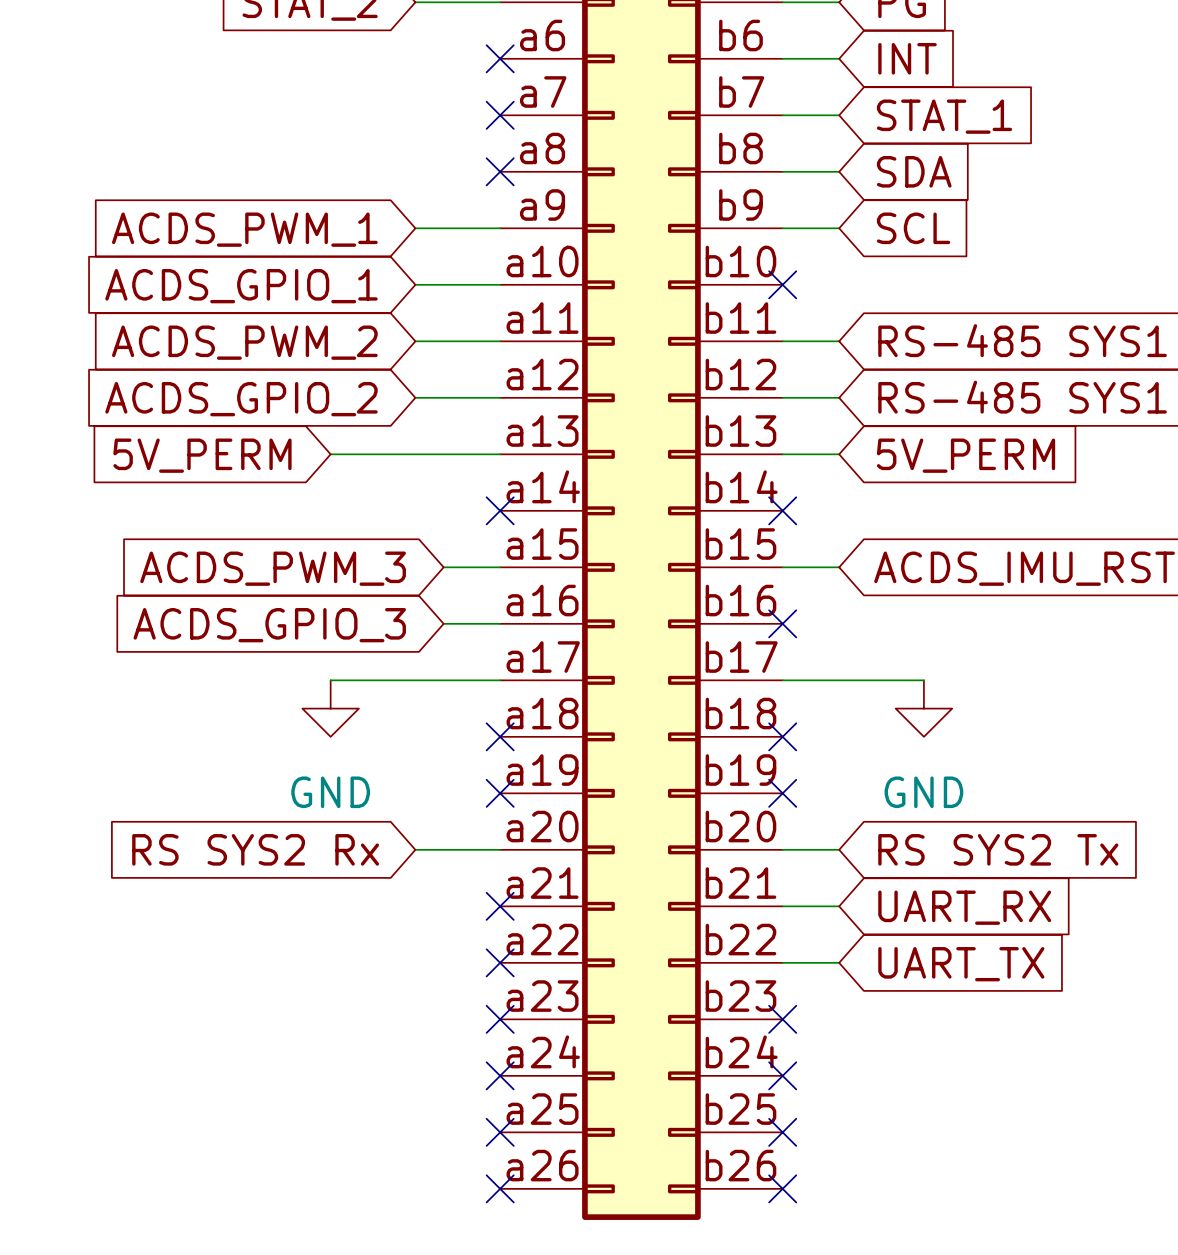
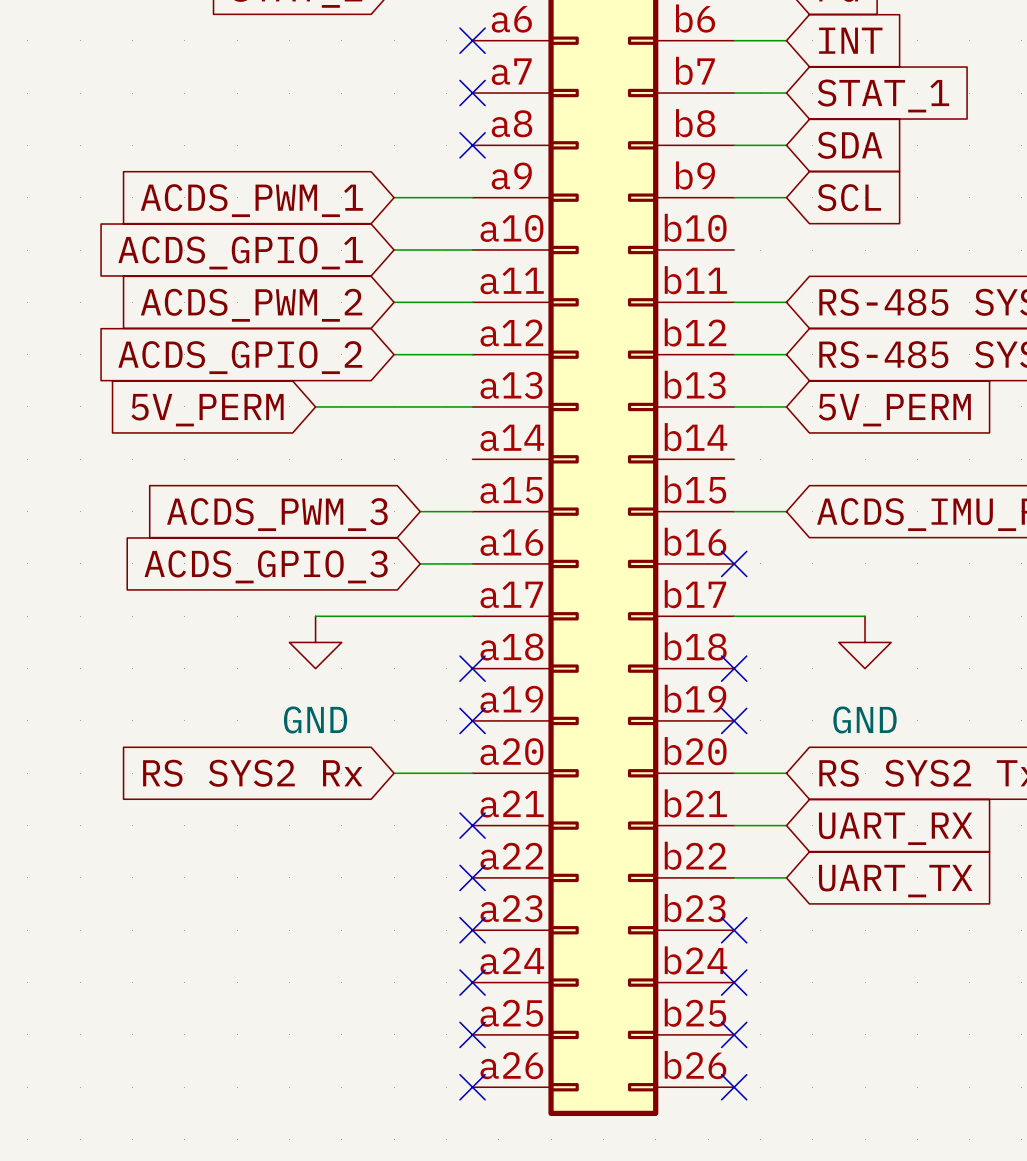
no-connect mark: (782, 284) -> none
no-connect mark: (500, 510) -> none
no-connect mark: (782, 510) -> none

